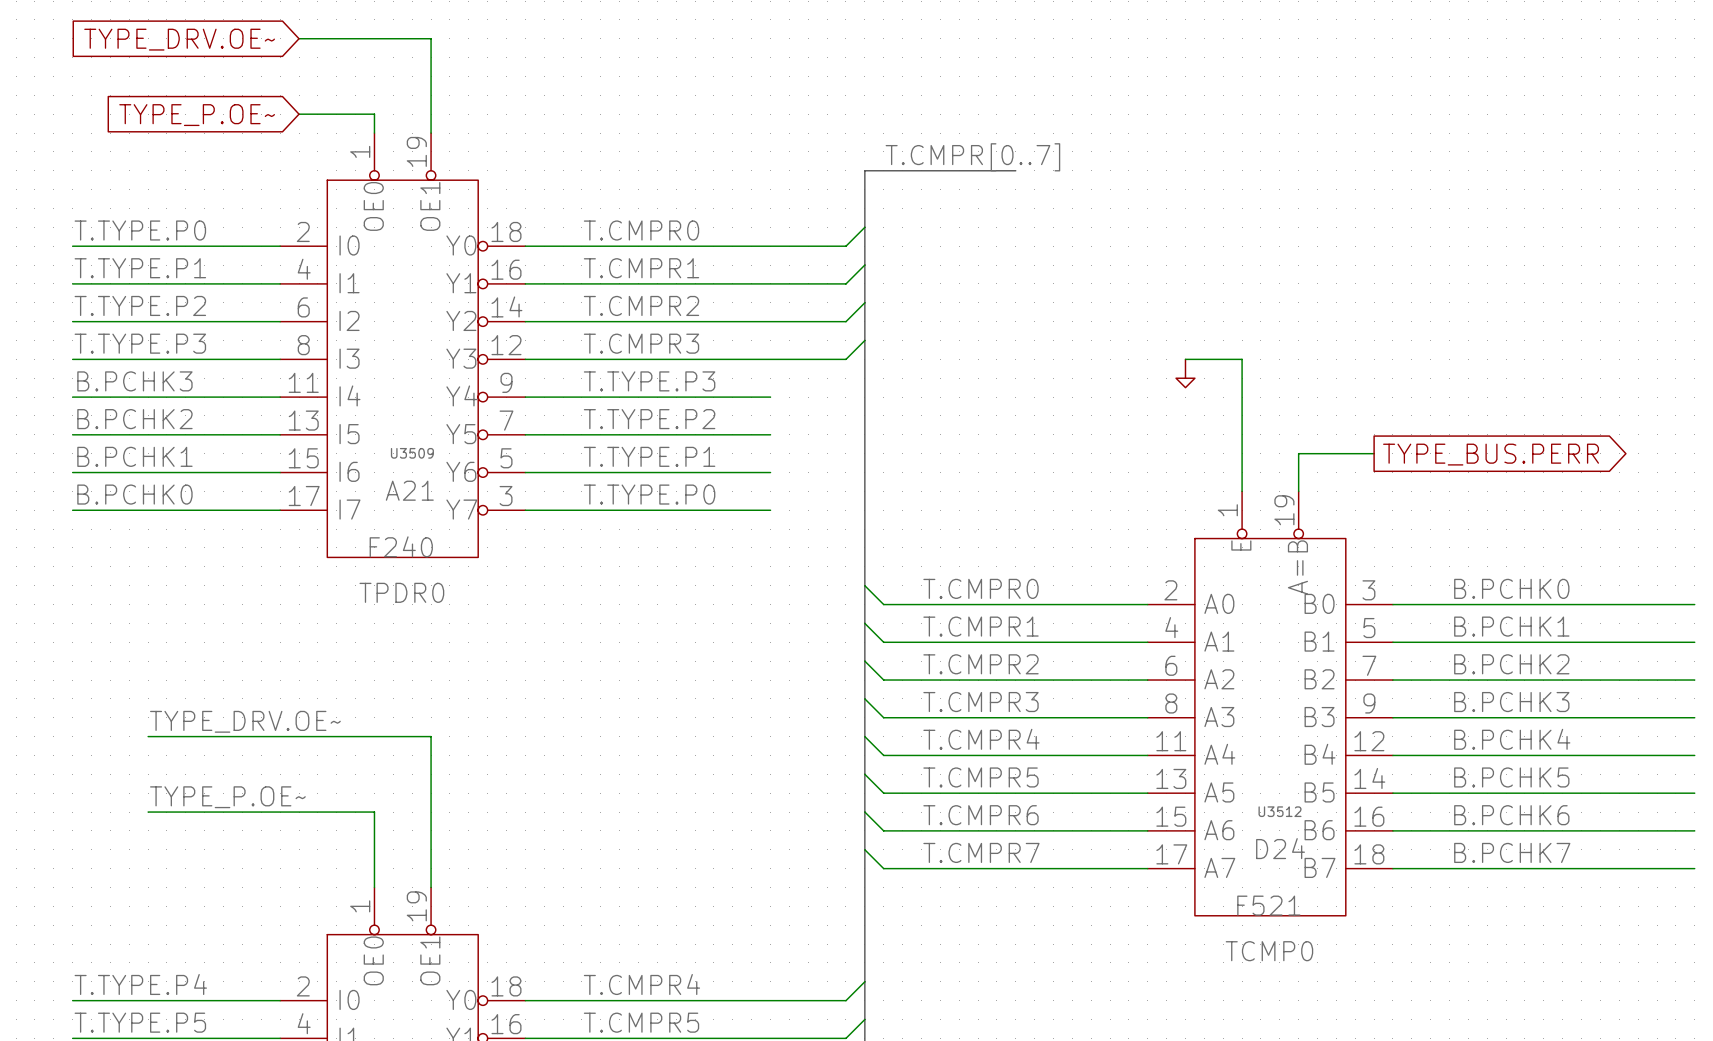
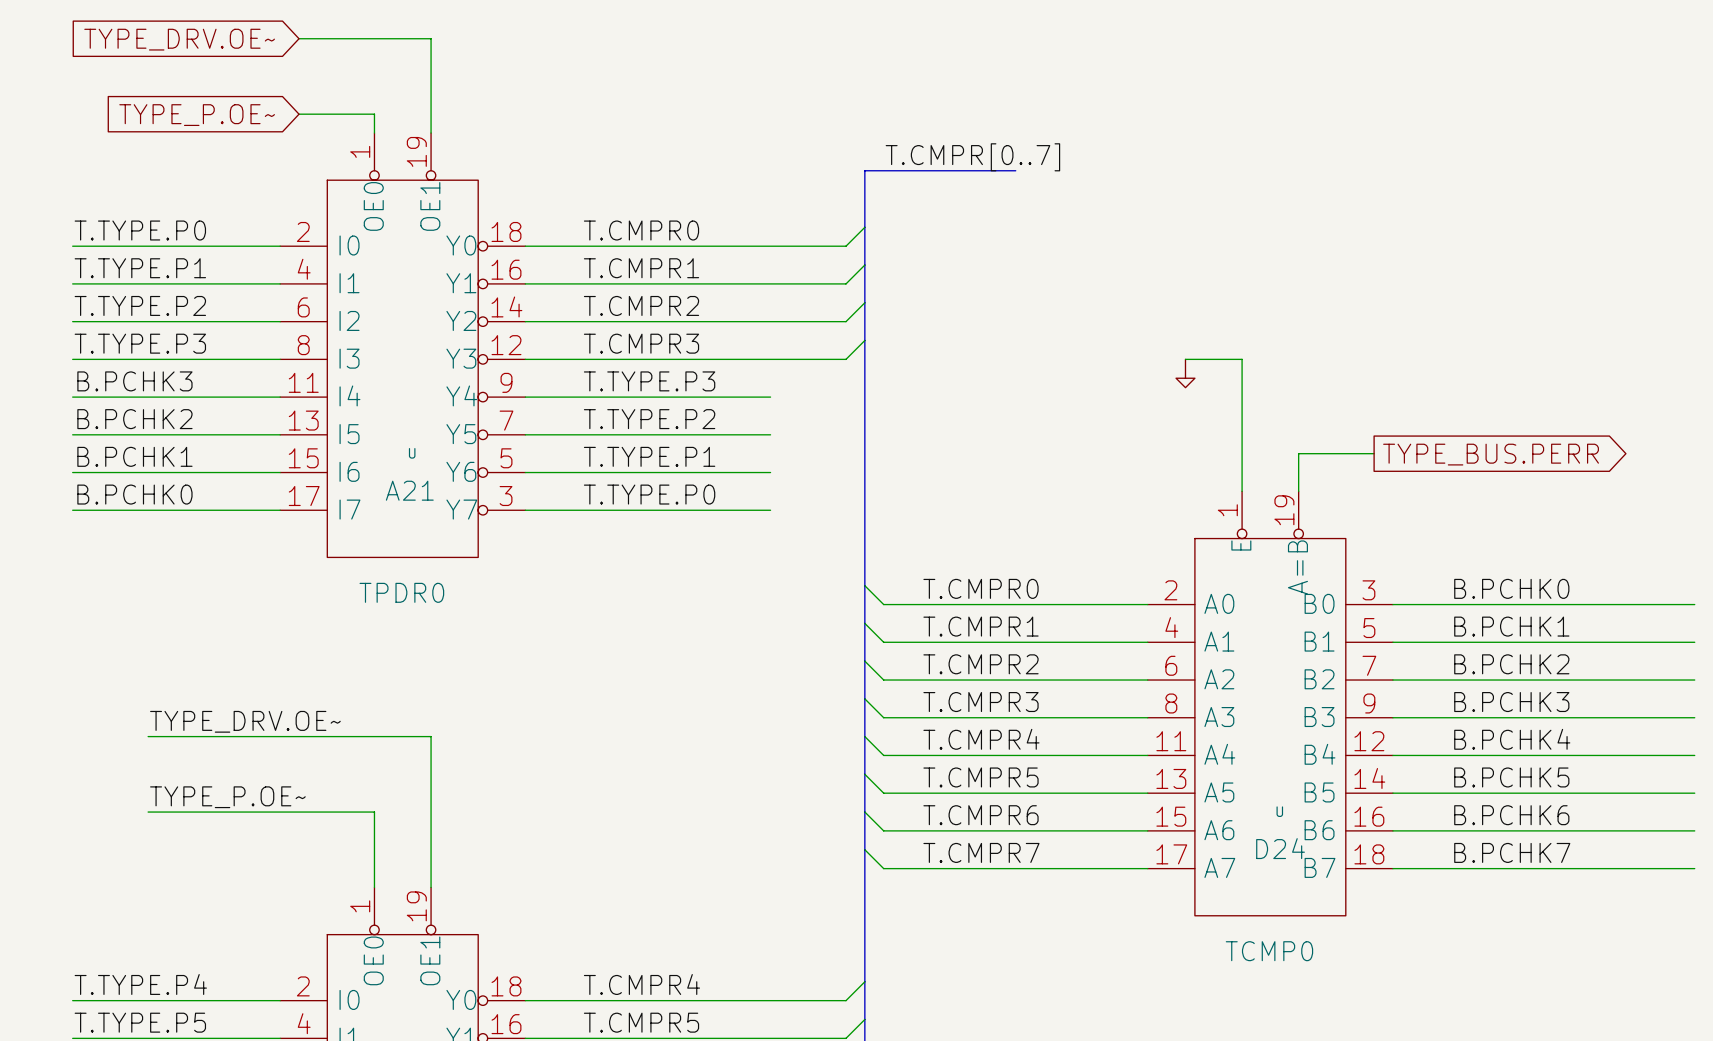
U3509 name: U3509 (412, 453) -> U (412, 453)
U3509 value: F240 (401, 546) -> none
U3512 name: U3512 (1280, 811) -> U (1279, 811)
U3512 value: F521 (1268, 905) -> none

